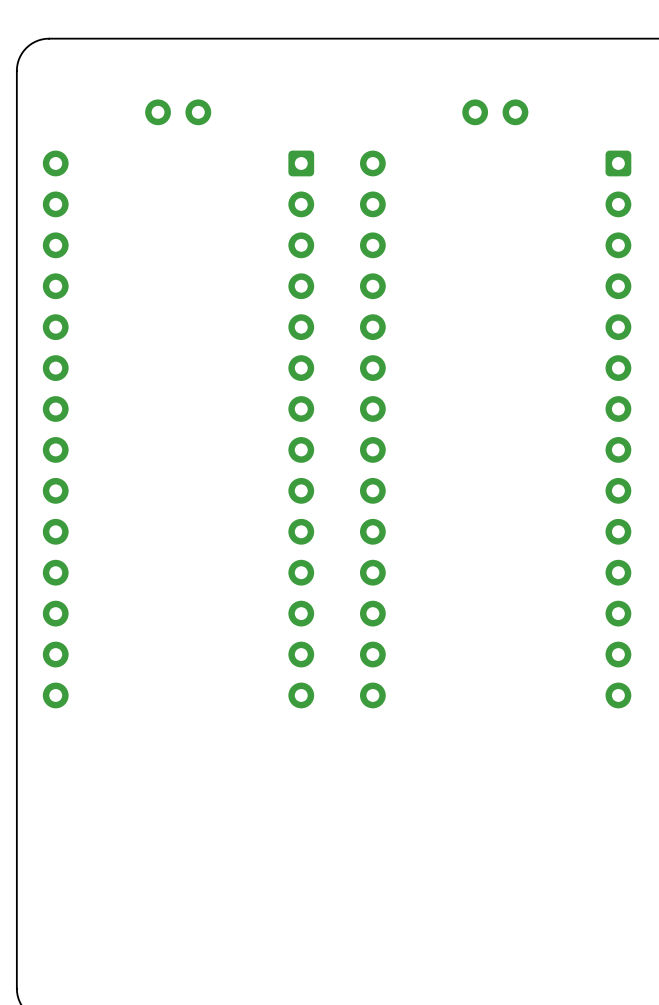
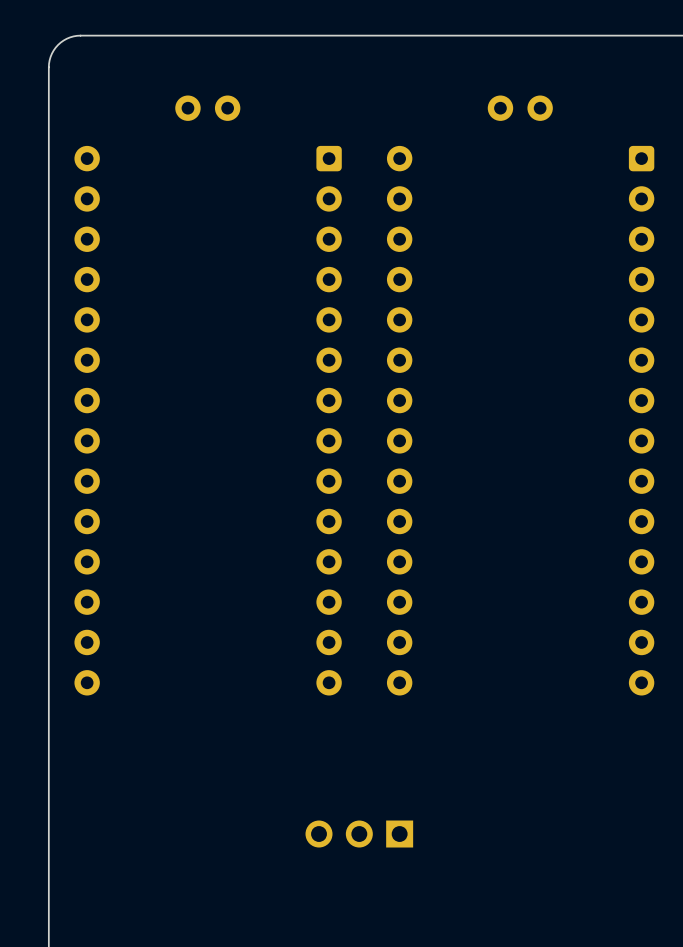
part: none -> (359, 834)

